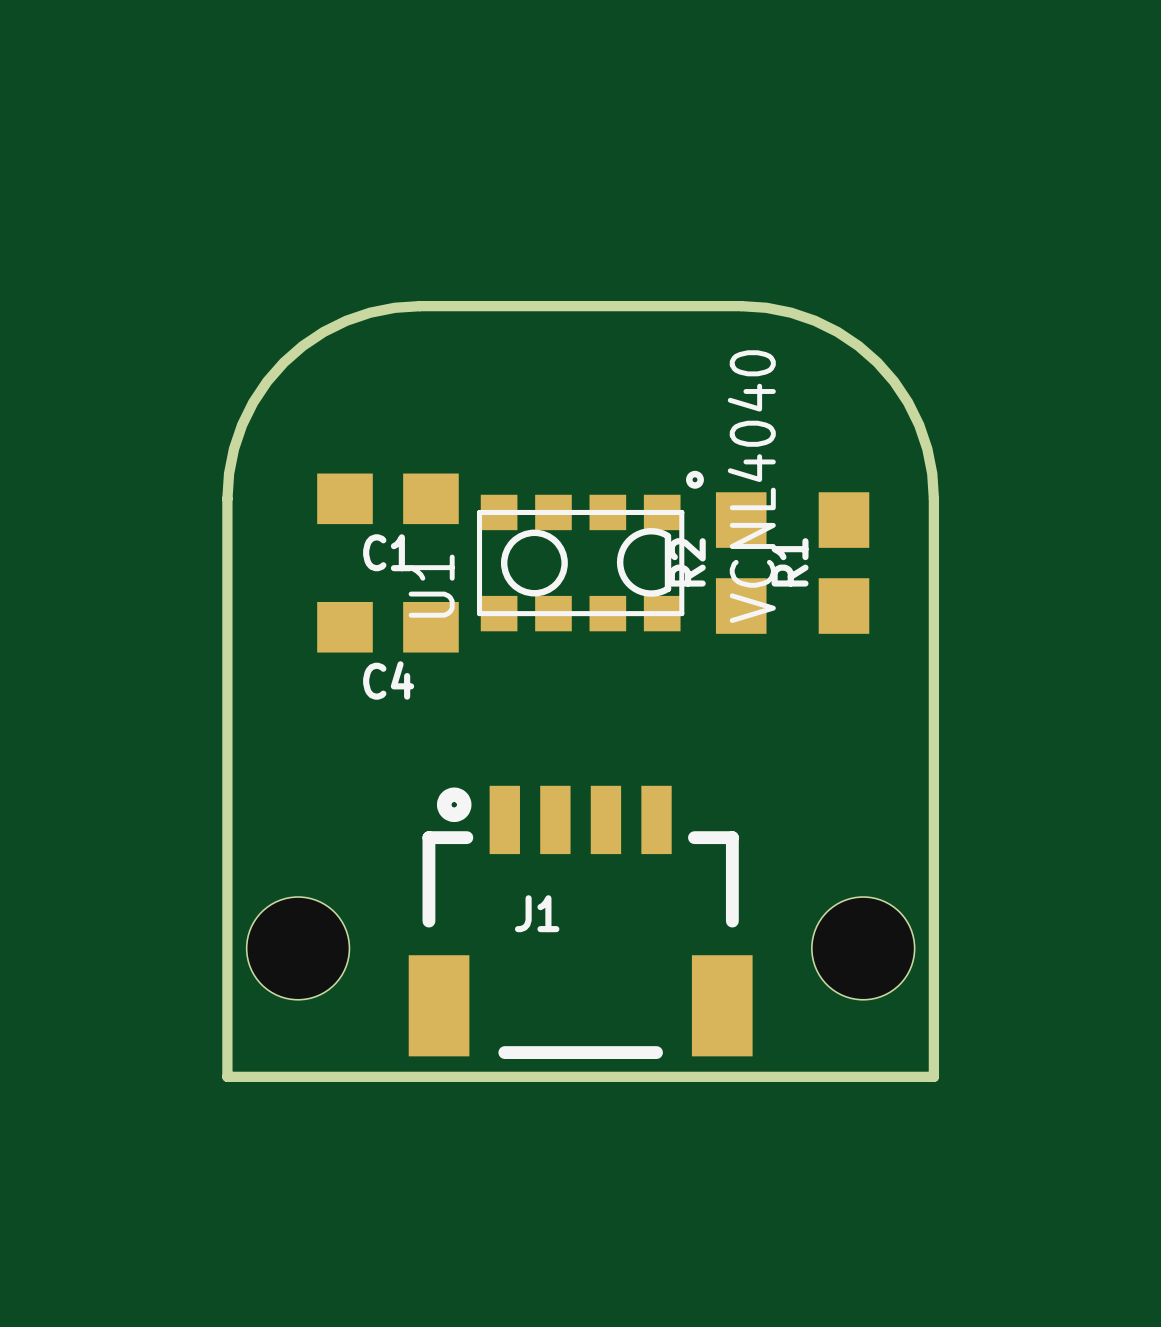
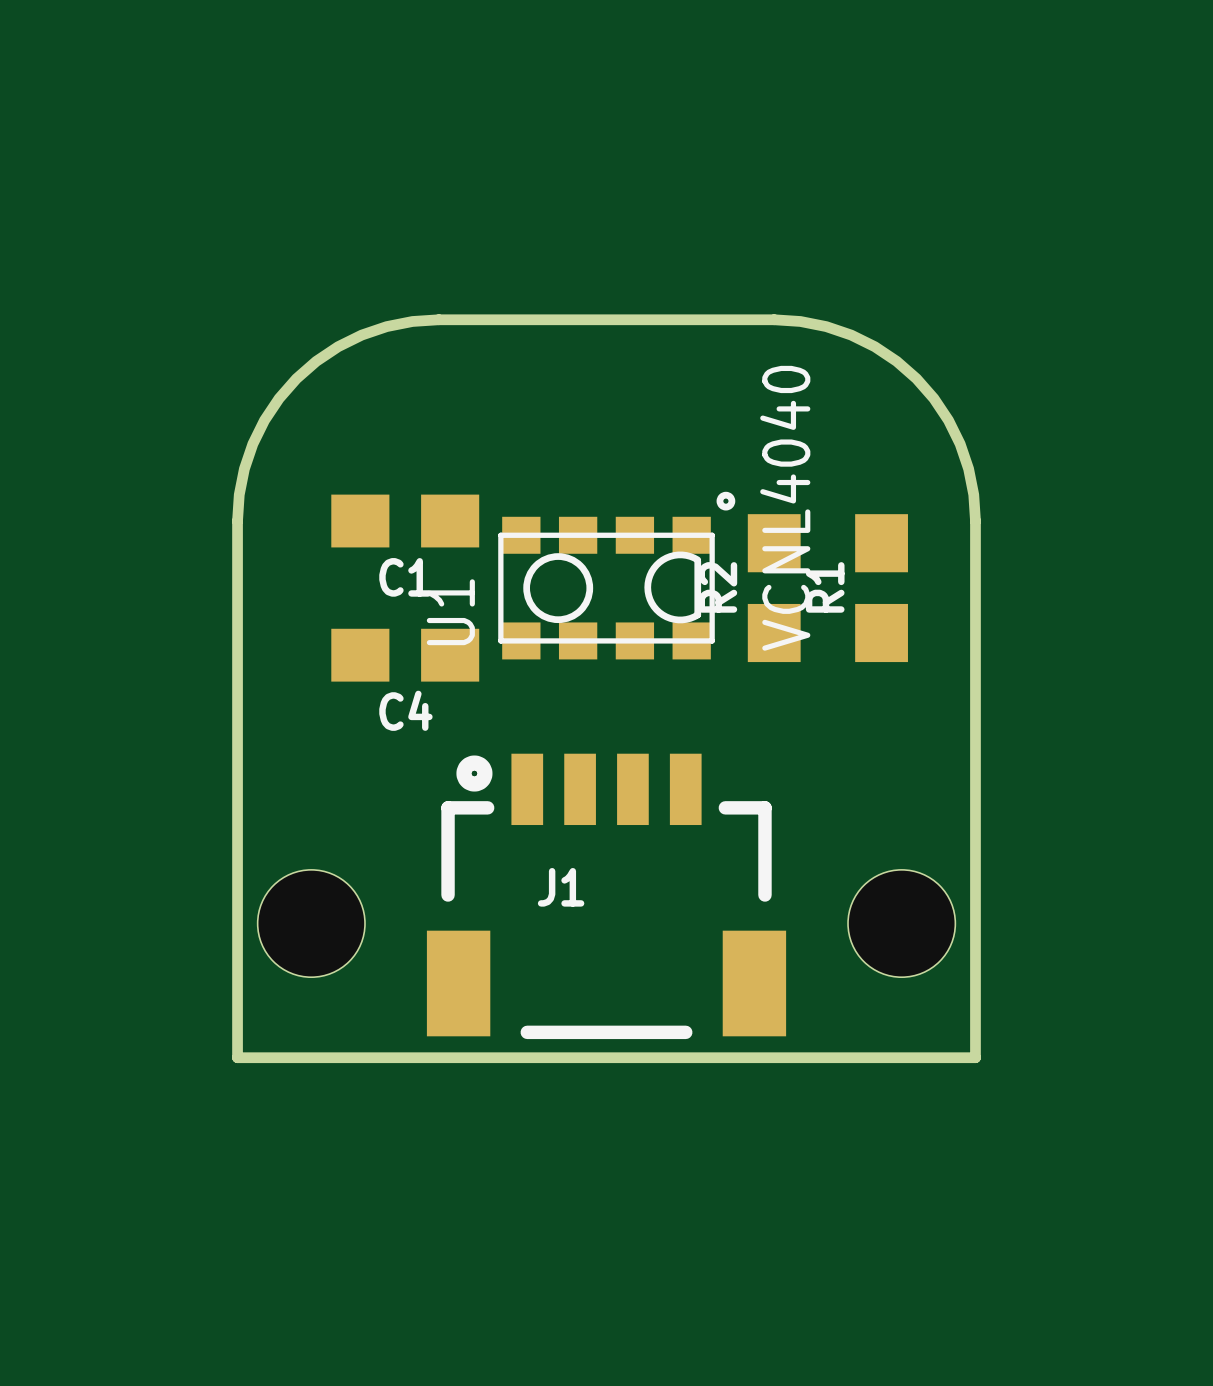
J1 position: (580, 922) -> (606, 896)
part position: (298, 948) -> (311, 923)
part position: (863, 948) -> (901, 923)
board edge: (227, 1012) (227, 1076) (933, 1076) (933, 1012) -> (237, 1057) (975, 1057)

